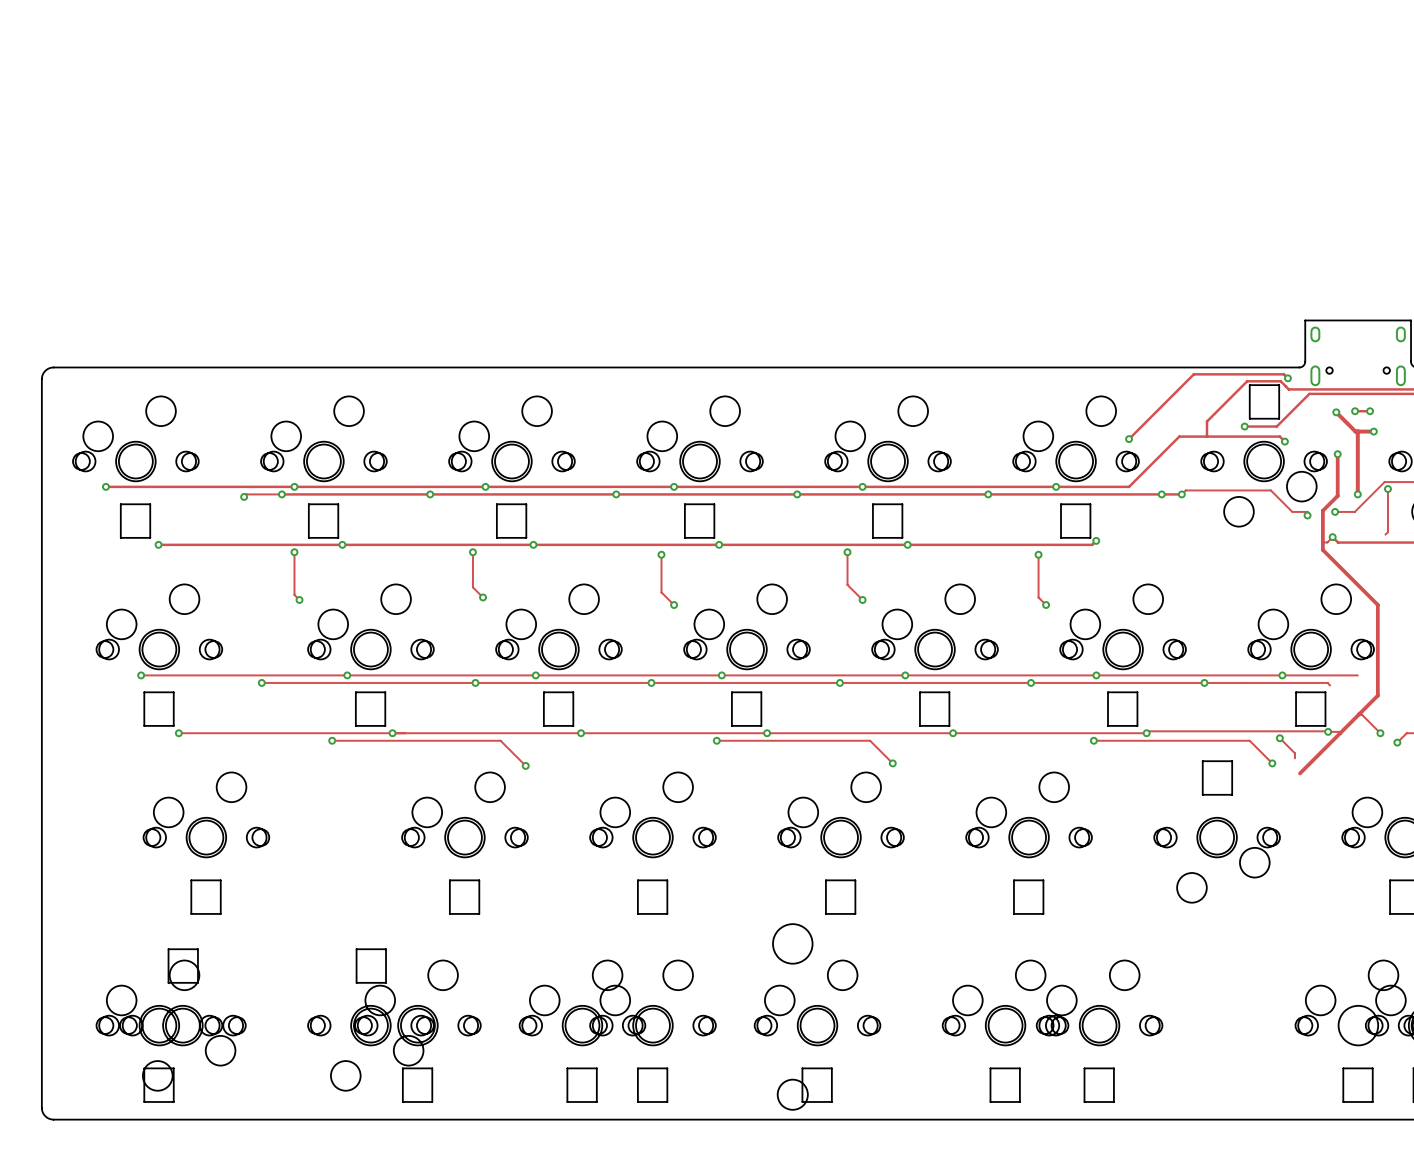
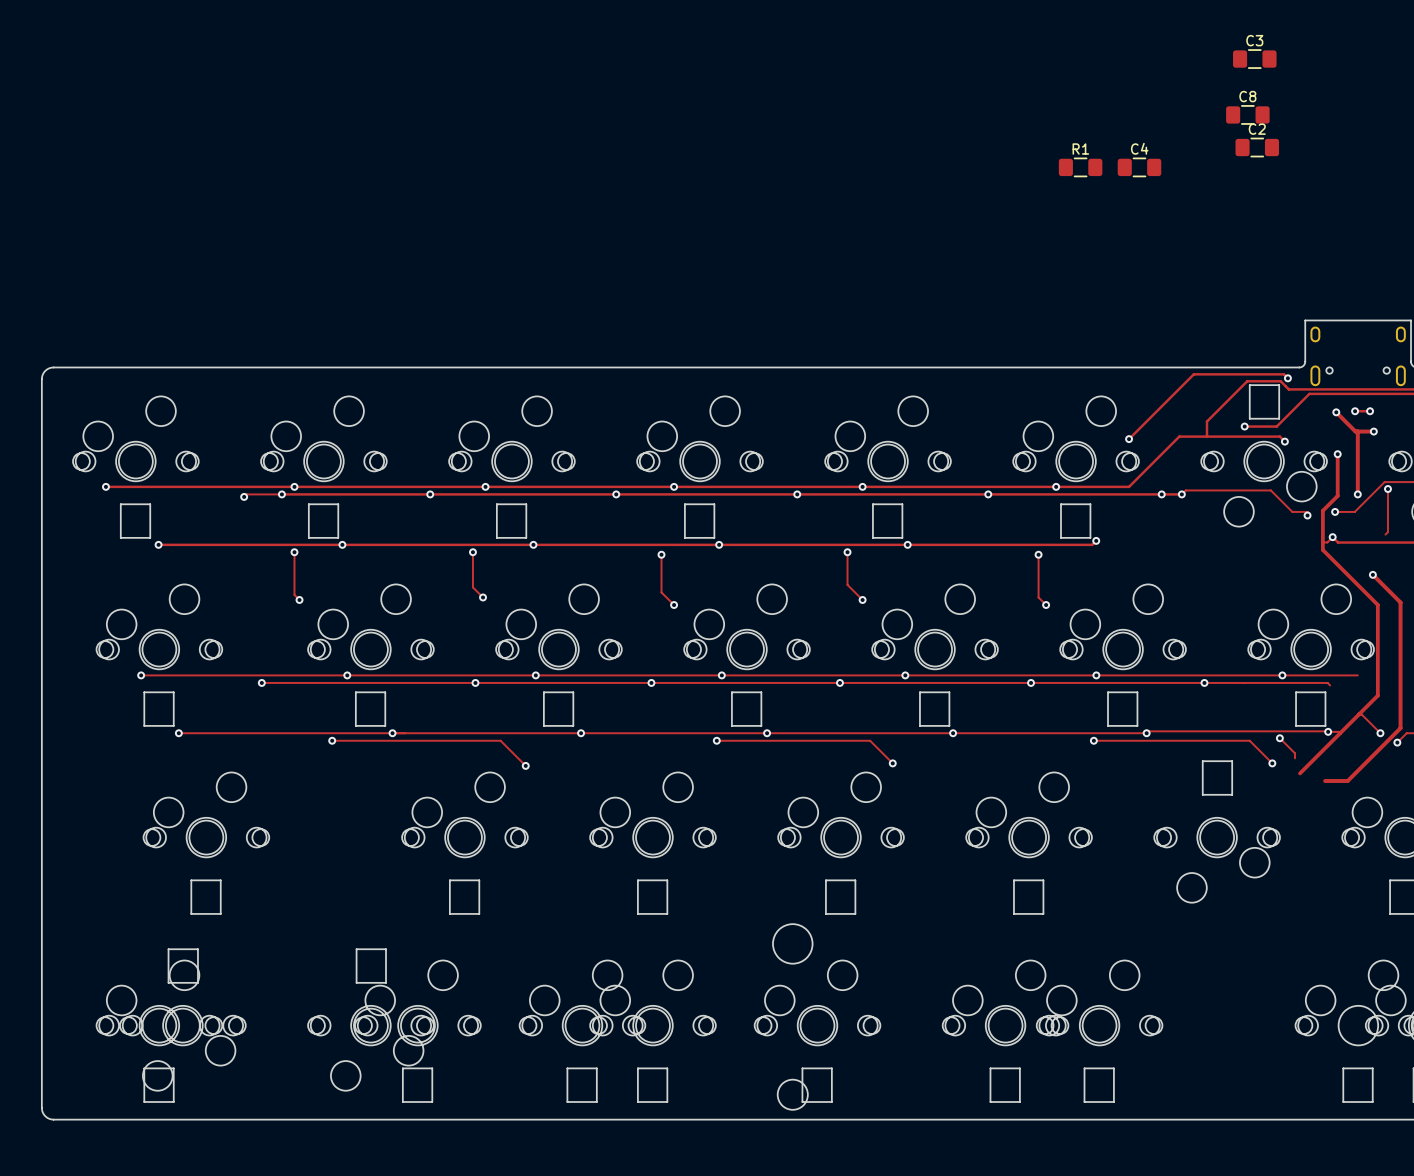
C3: none -> (1254, 59)
C8: none -> (1247, 114)
C2: none -> (1257, 147)
R1: none -> (1080, 167)
C4: none -> (1139, 167)
track: none -> (1372, 574) (1400, 602) (1400, 728) (1347, 780) (1325, 780)
via: none -> (1372, 574)

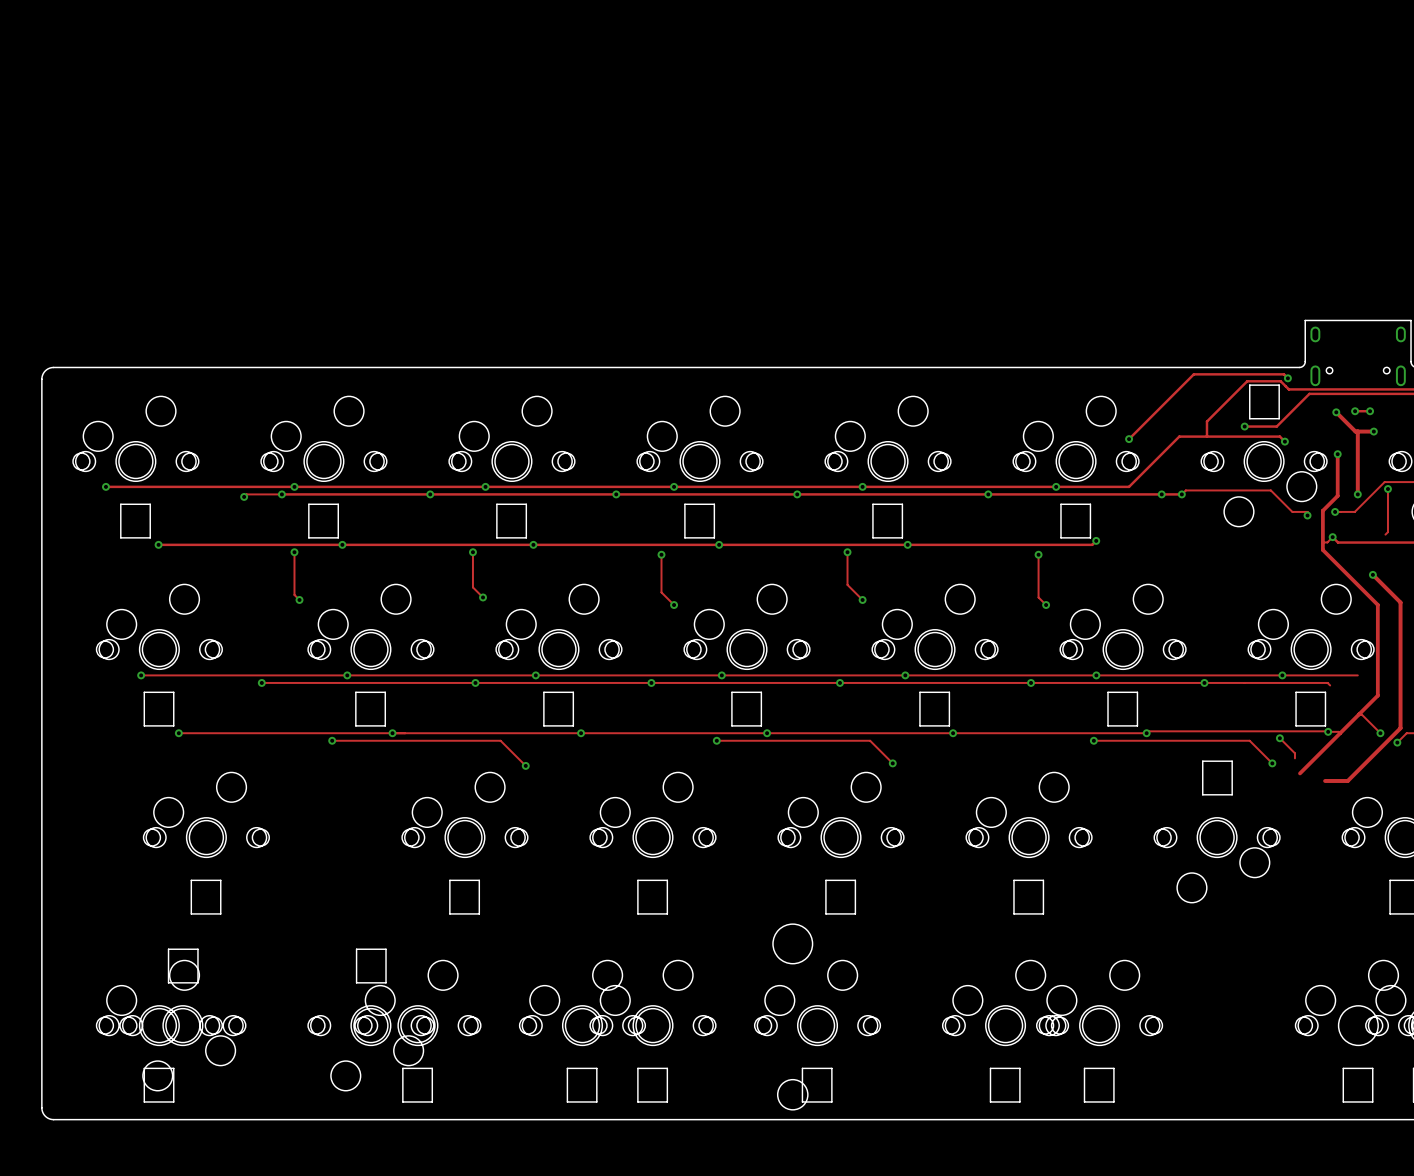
C3: (1254, 59) -> none
C8: (1247, 114) -> none
C2: (1257, 147) -> none
R1: (1080, 167) -> none
C4: (1139, 167) -> none

